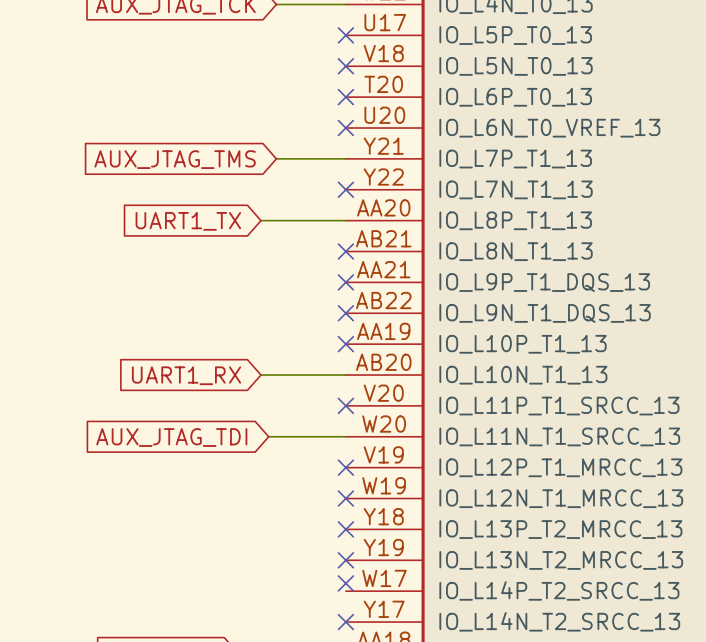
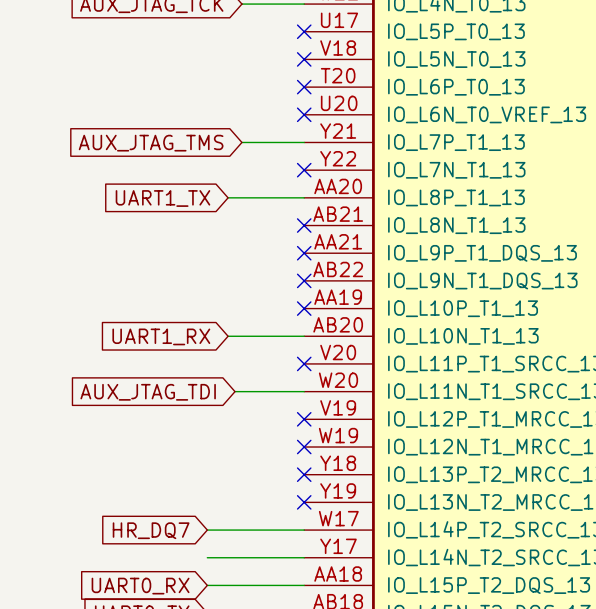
no-connect mark: (345, 583) -> none
global label: none -> HR_DQ7 (151, 530)
wire: none -> (207, 530) (304, 530)
wire: none -> (207, 557) (304, 557)
no-connect mark: (345, 622) -> none

